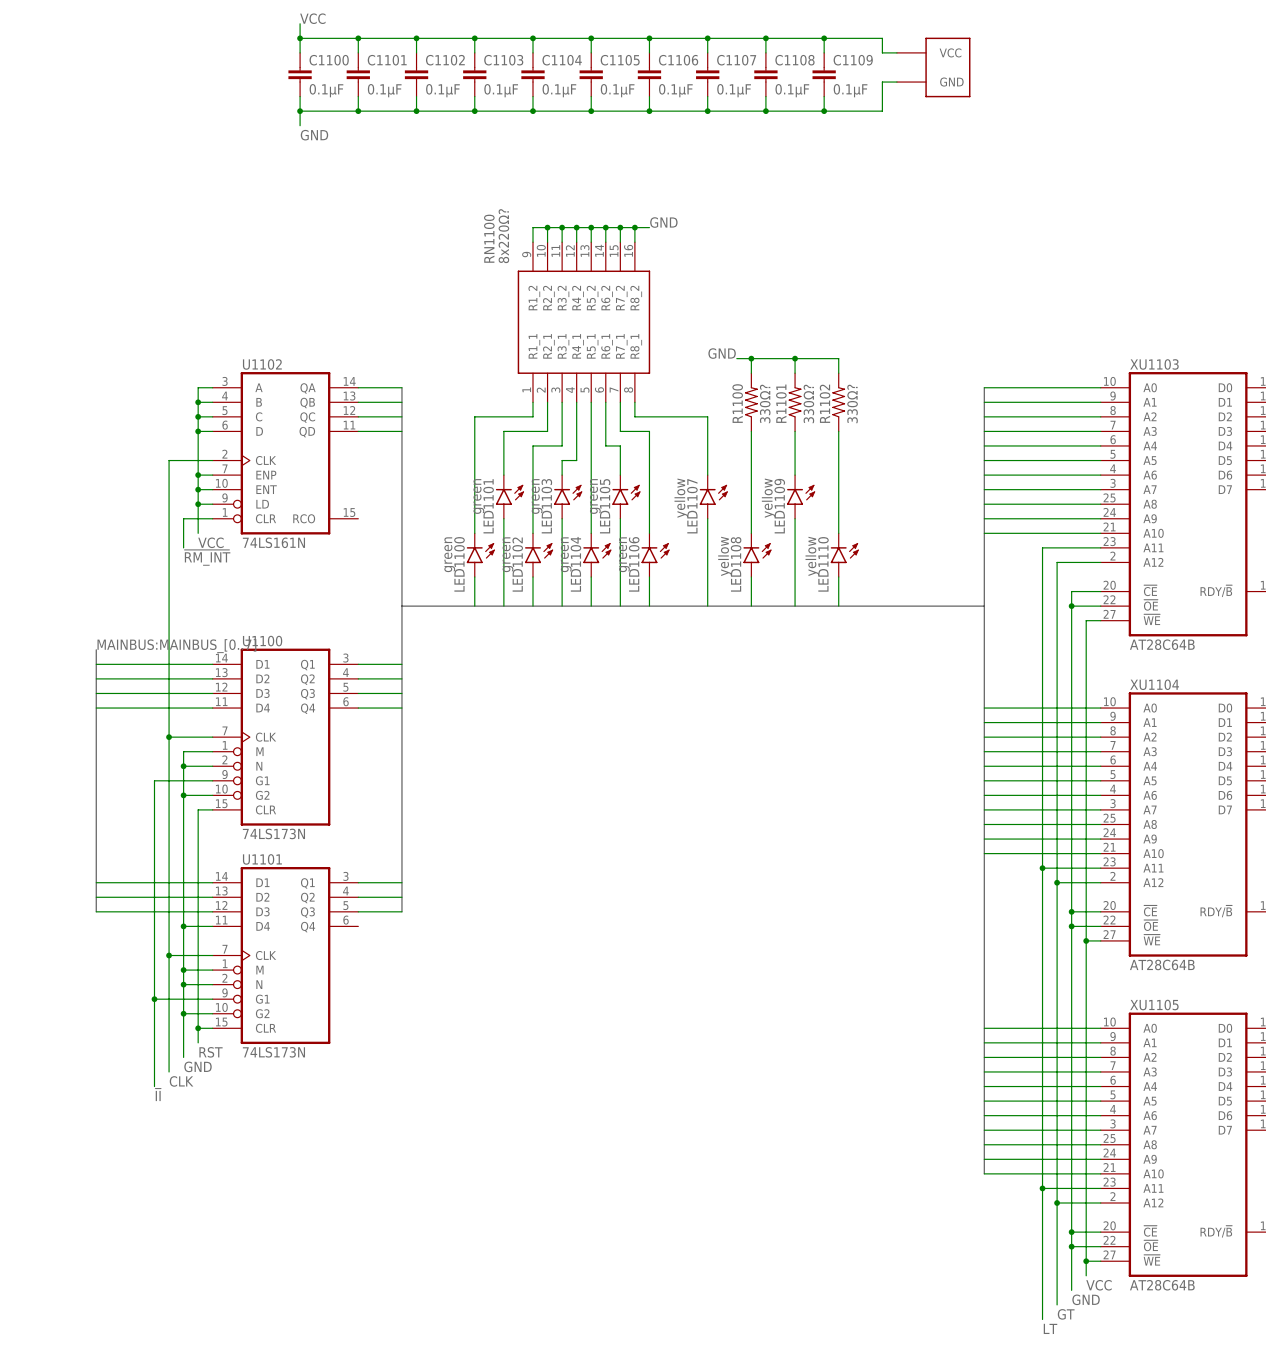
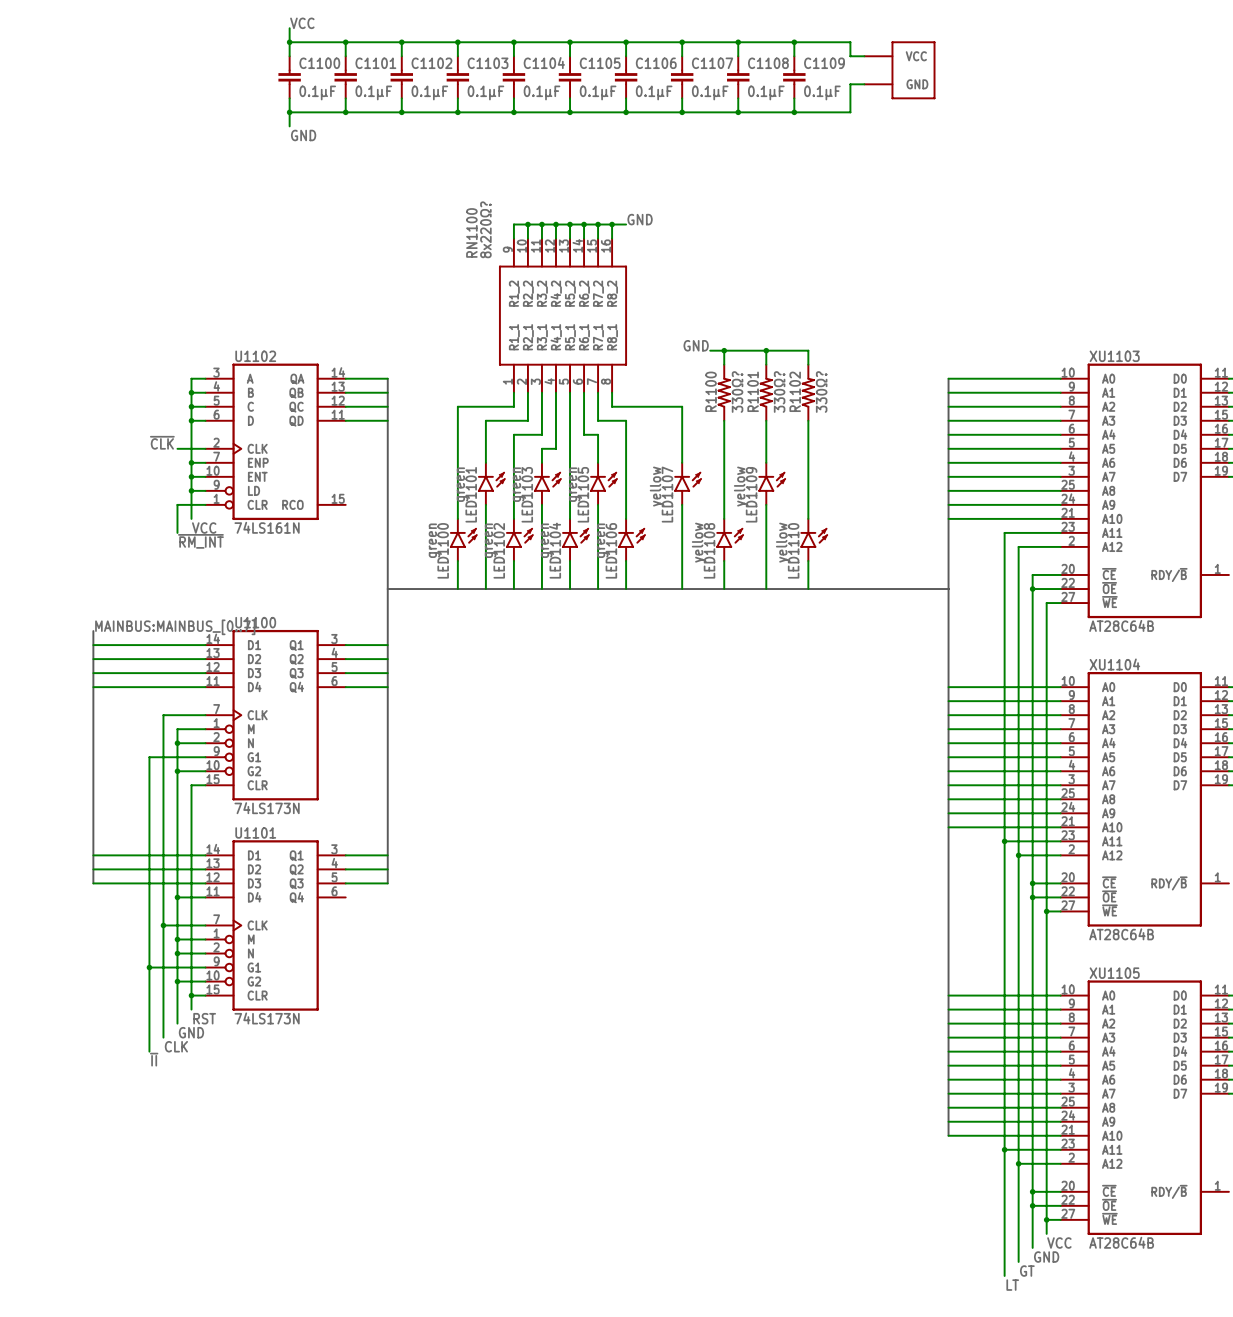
label: none -> ~{CLK} (162, 442)
wire: (183, 460) (169, 460) (169, 737) -> none
junction: (169, 737) -> none

